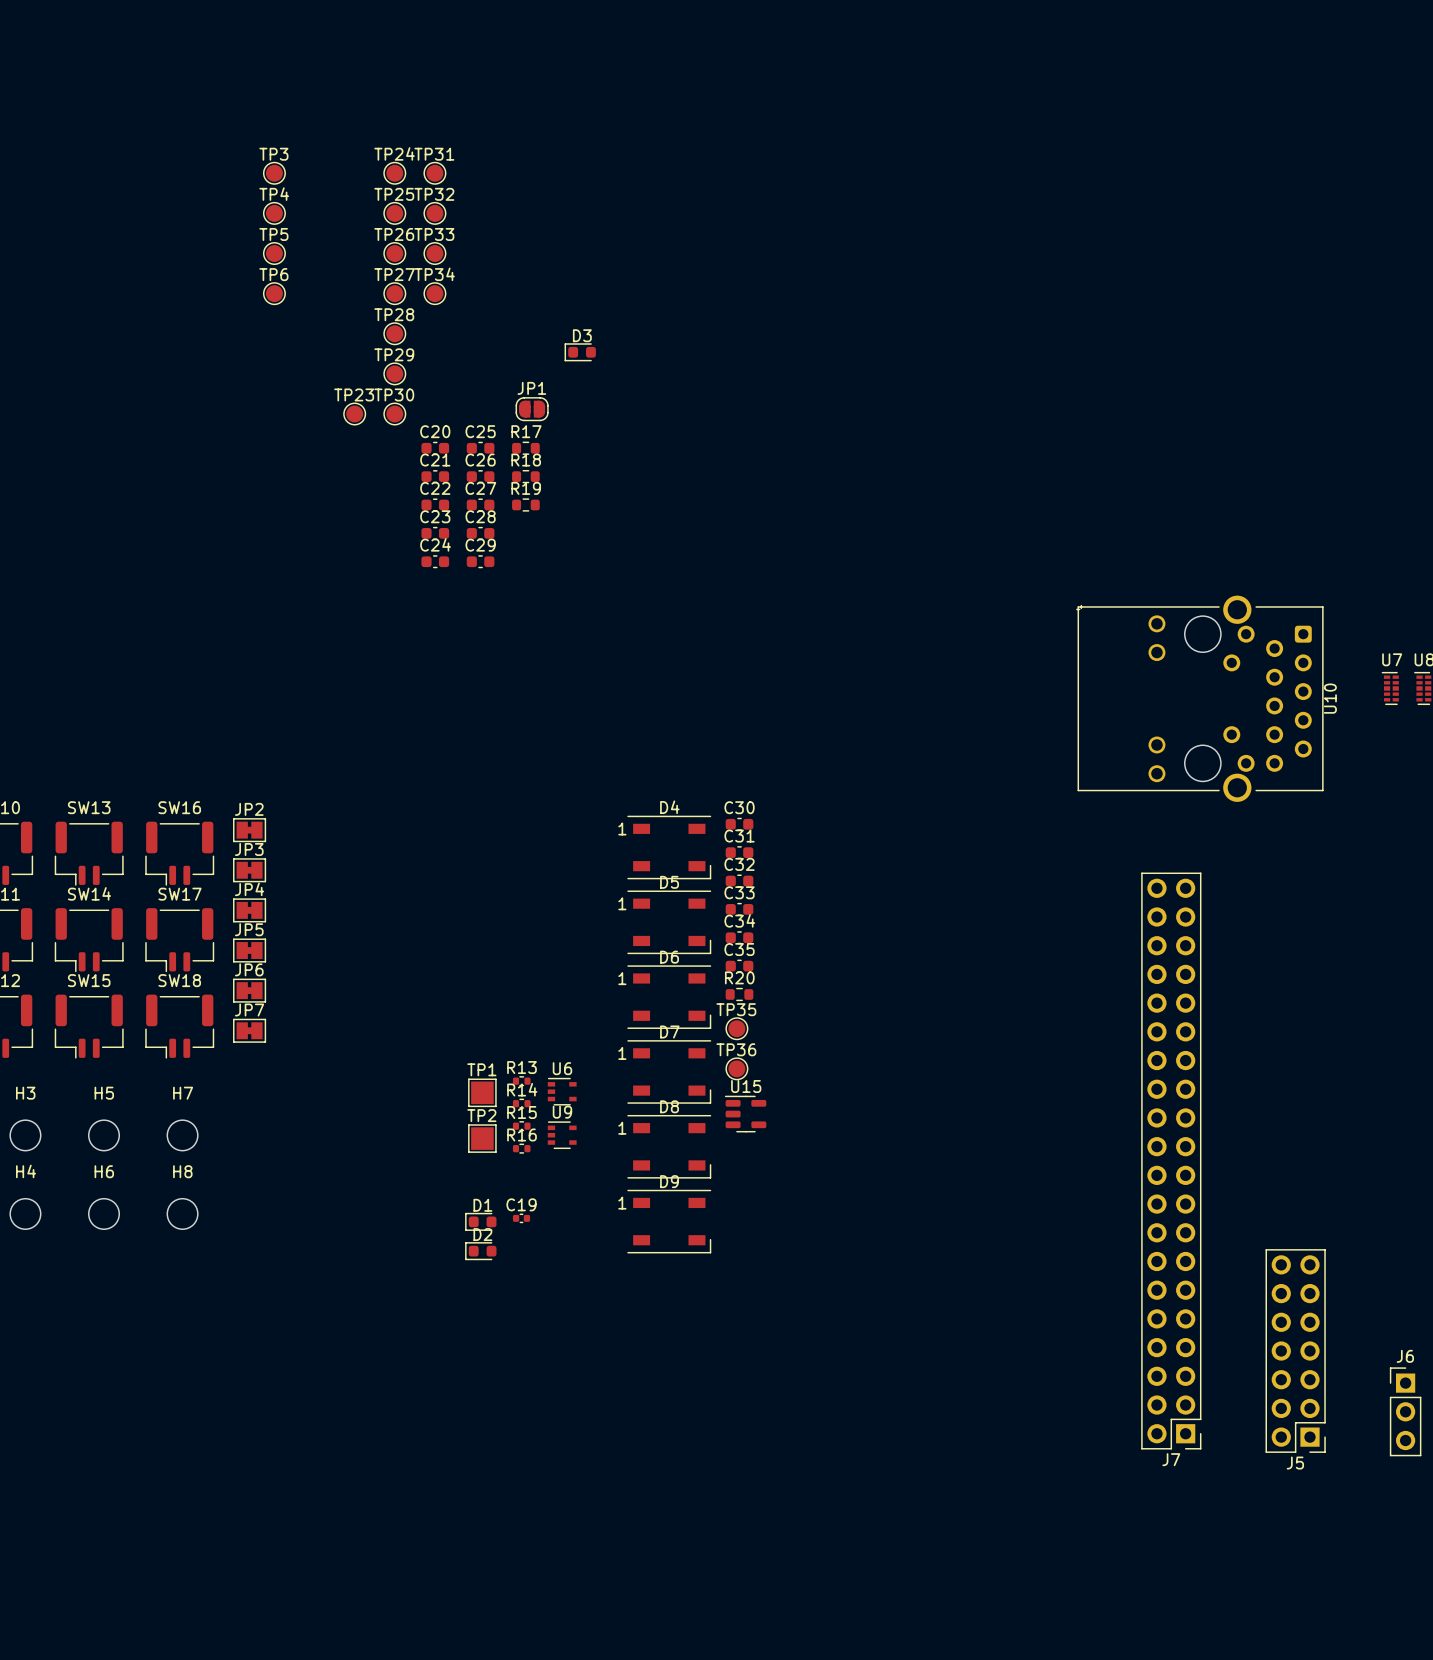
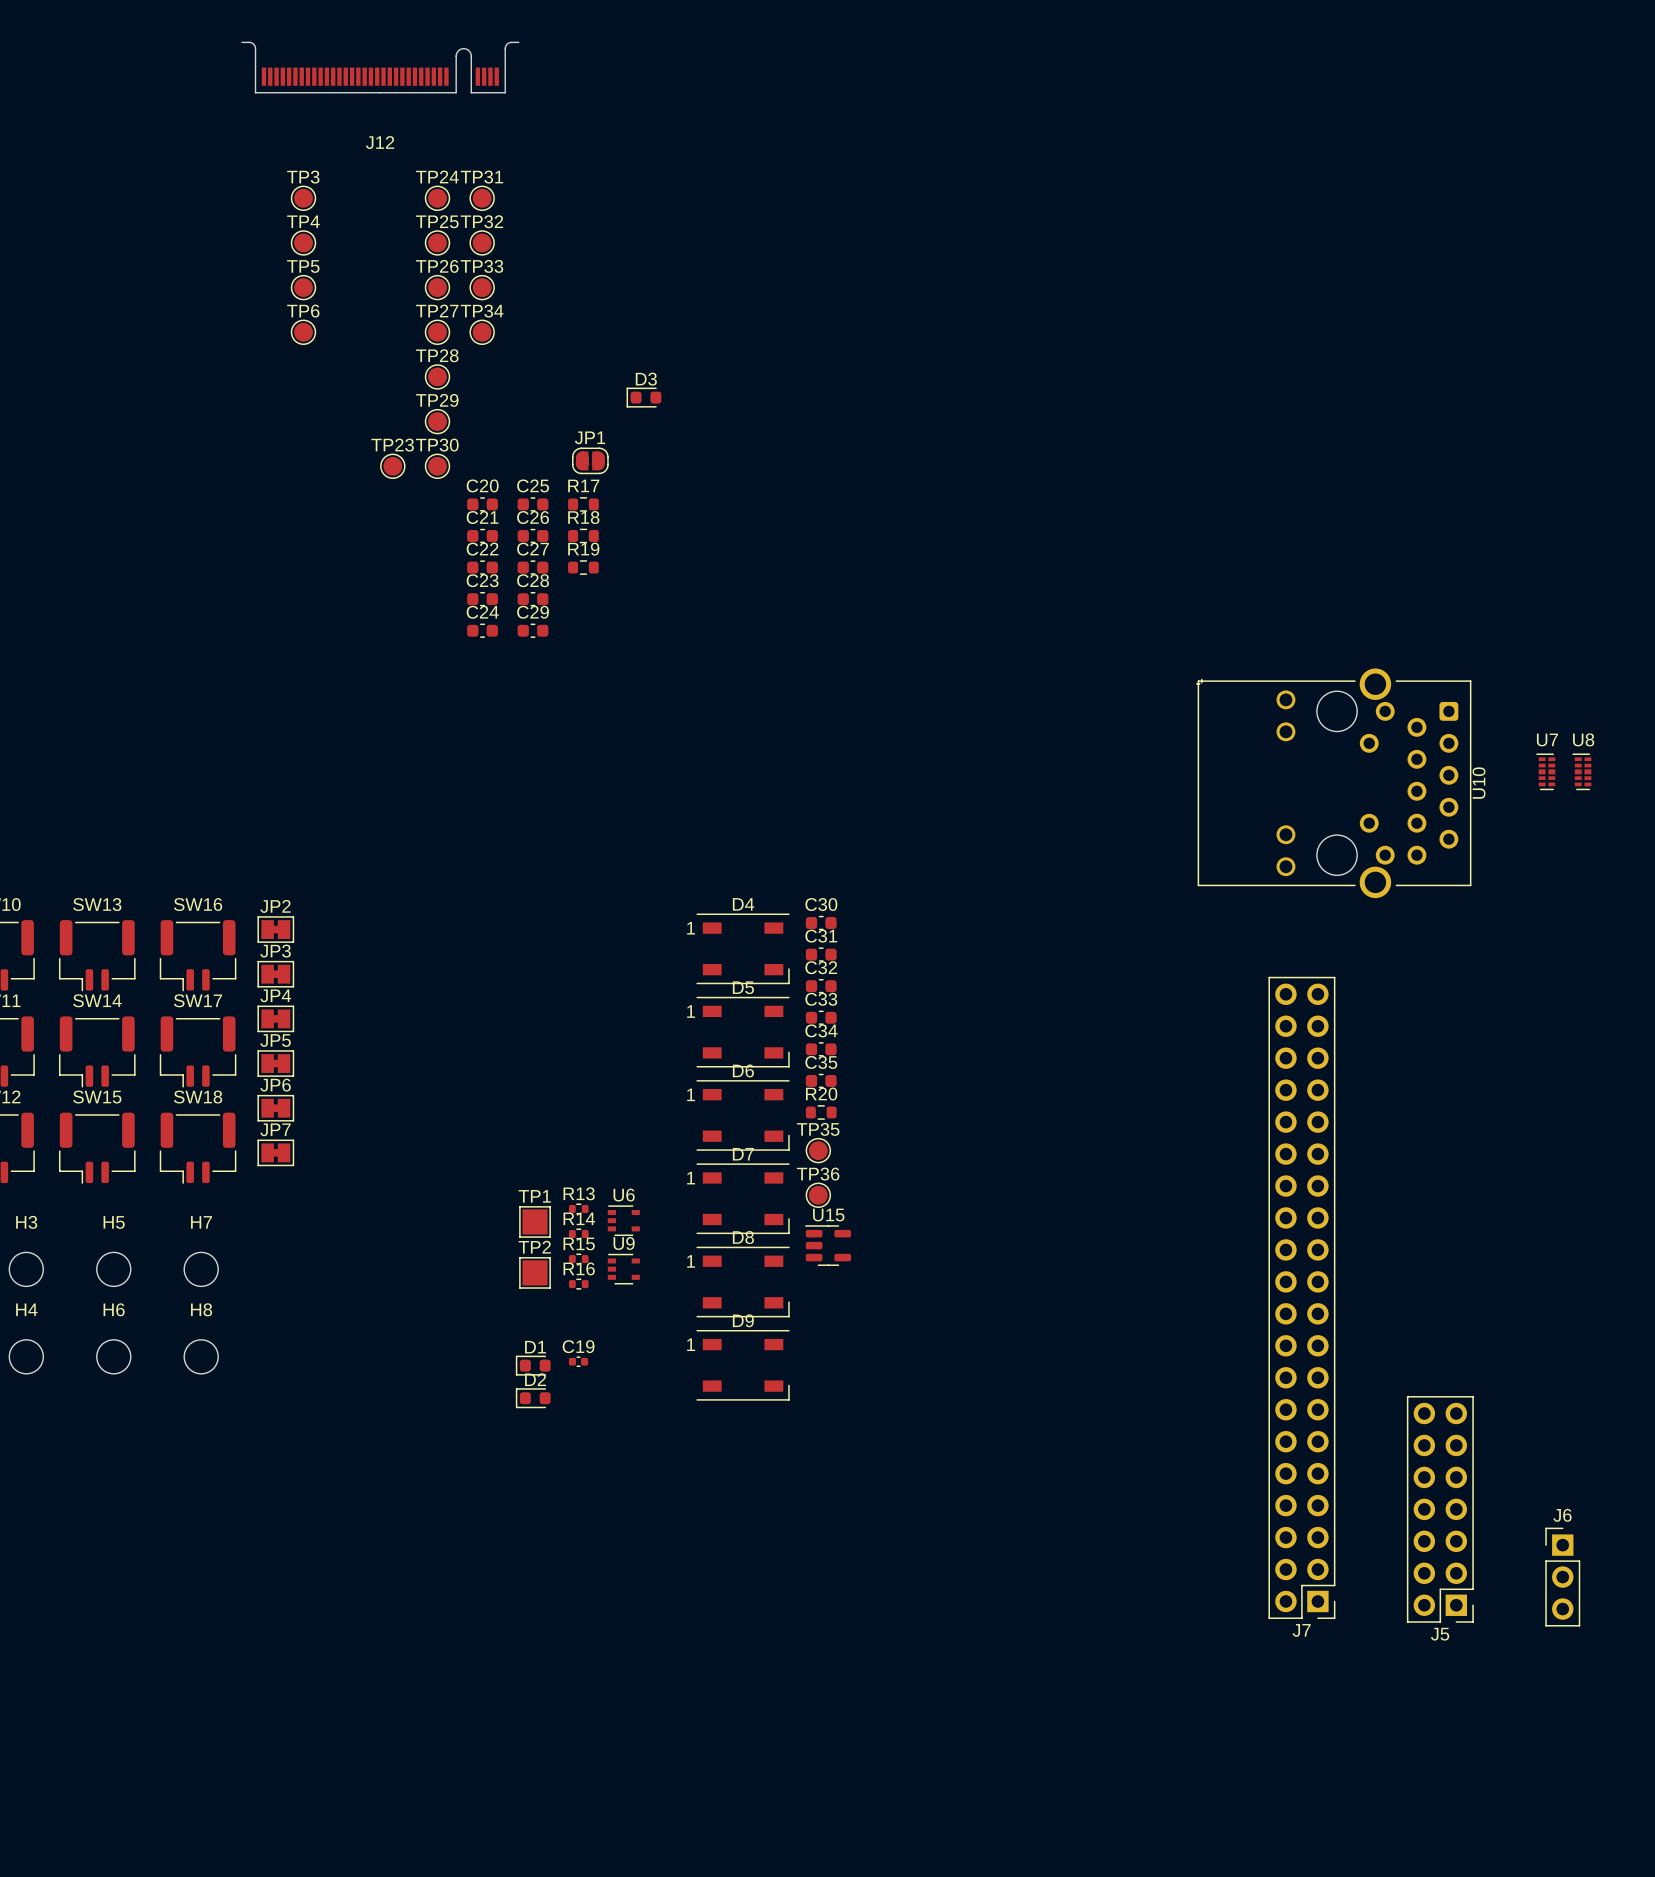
J12: none -> (380, 67)

